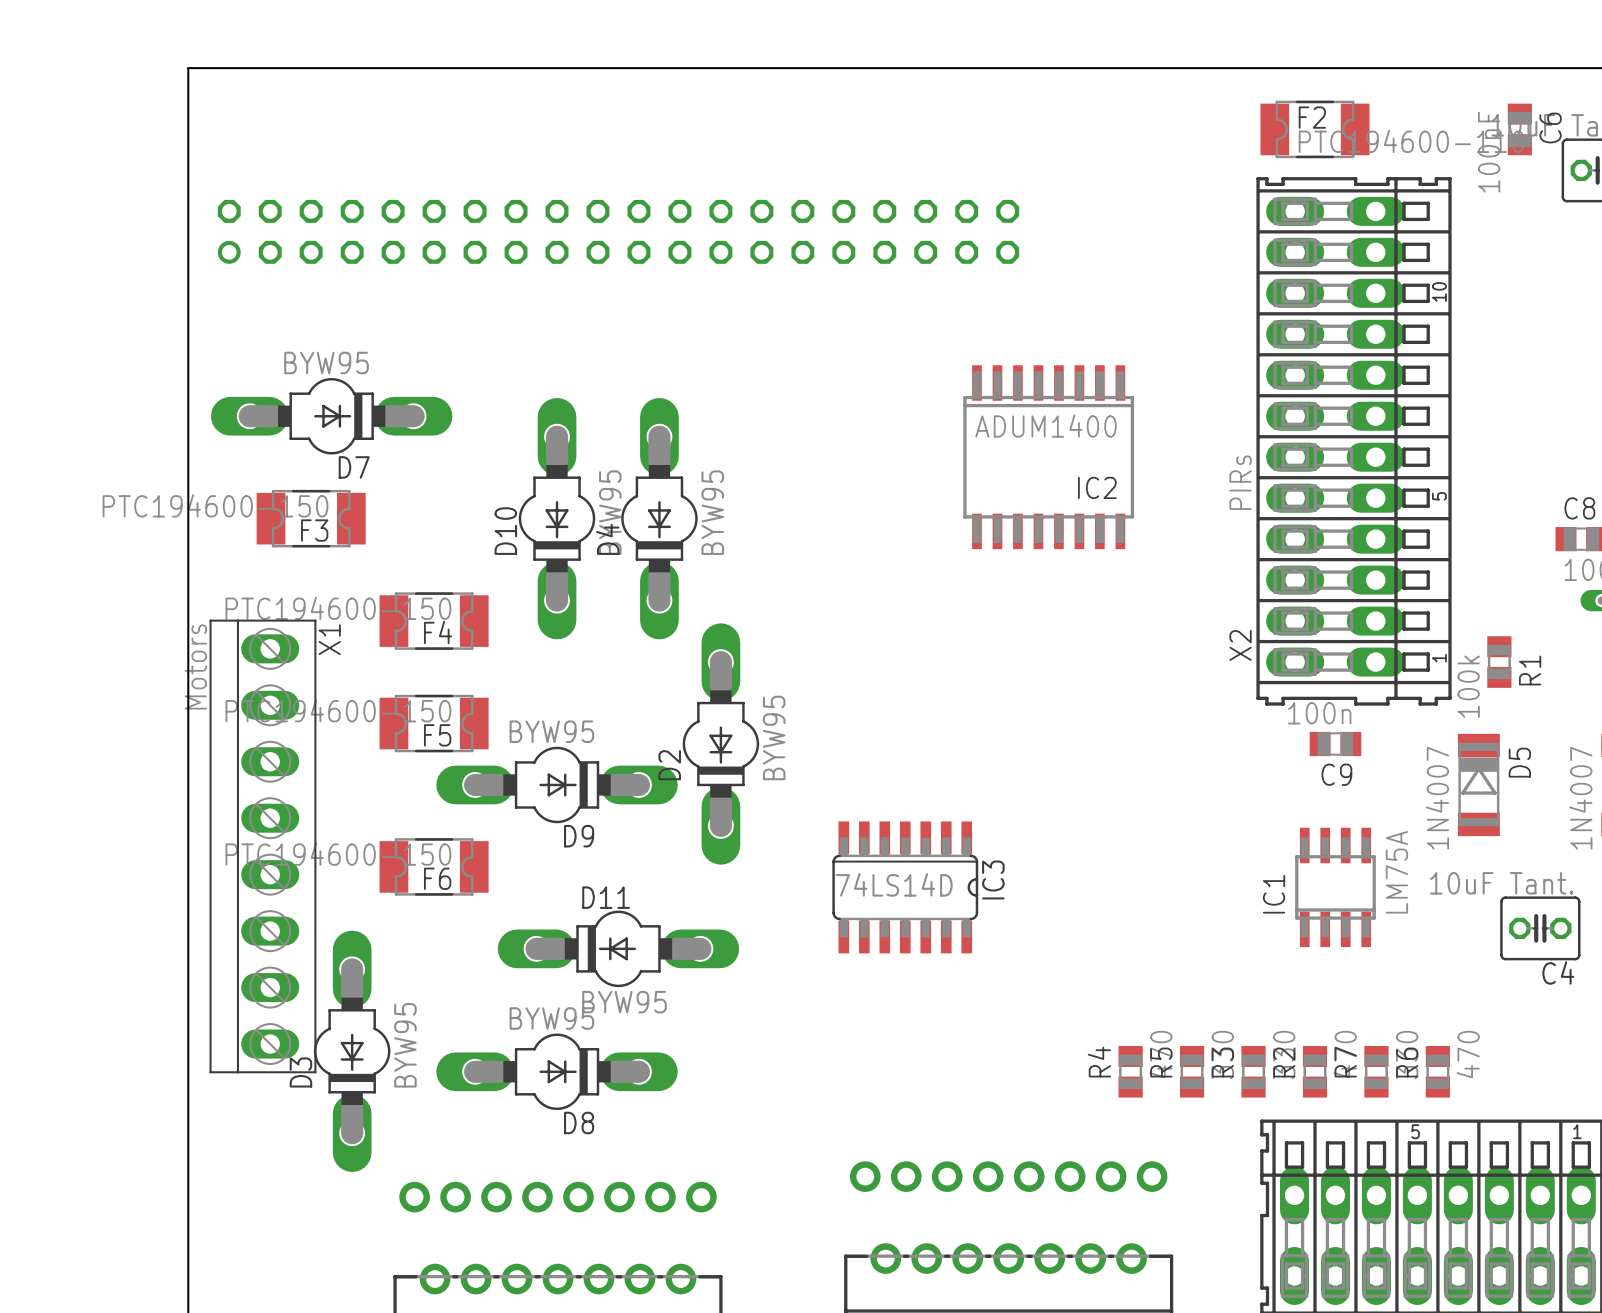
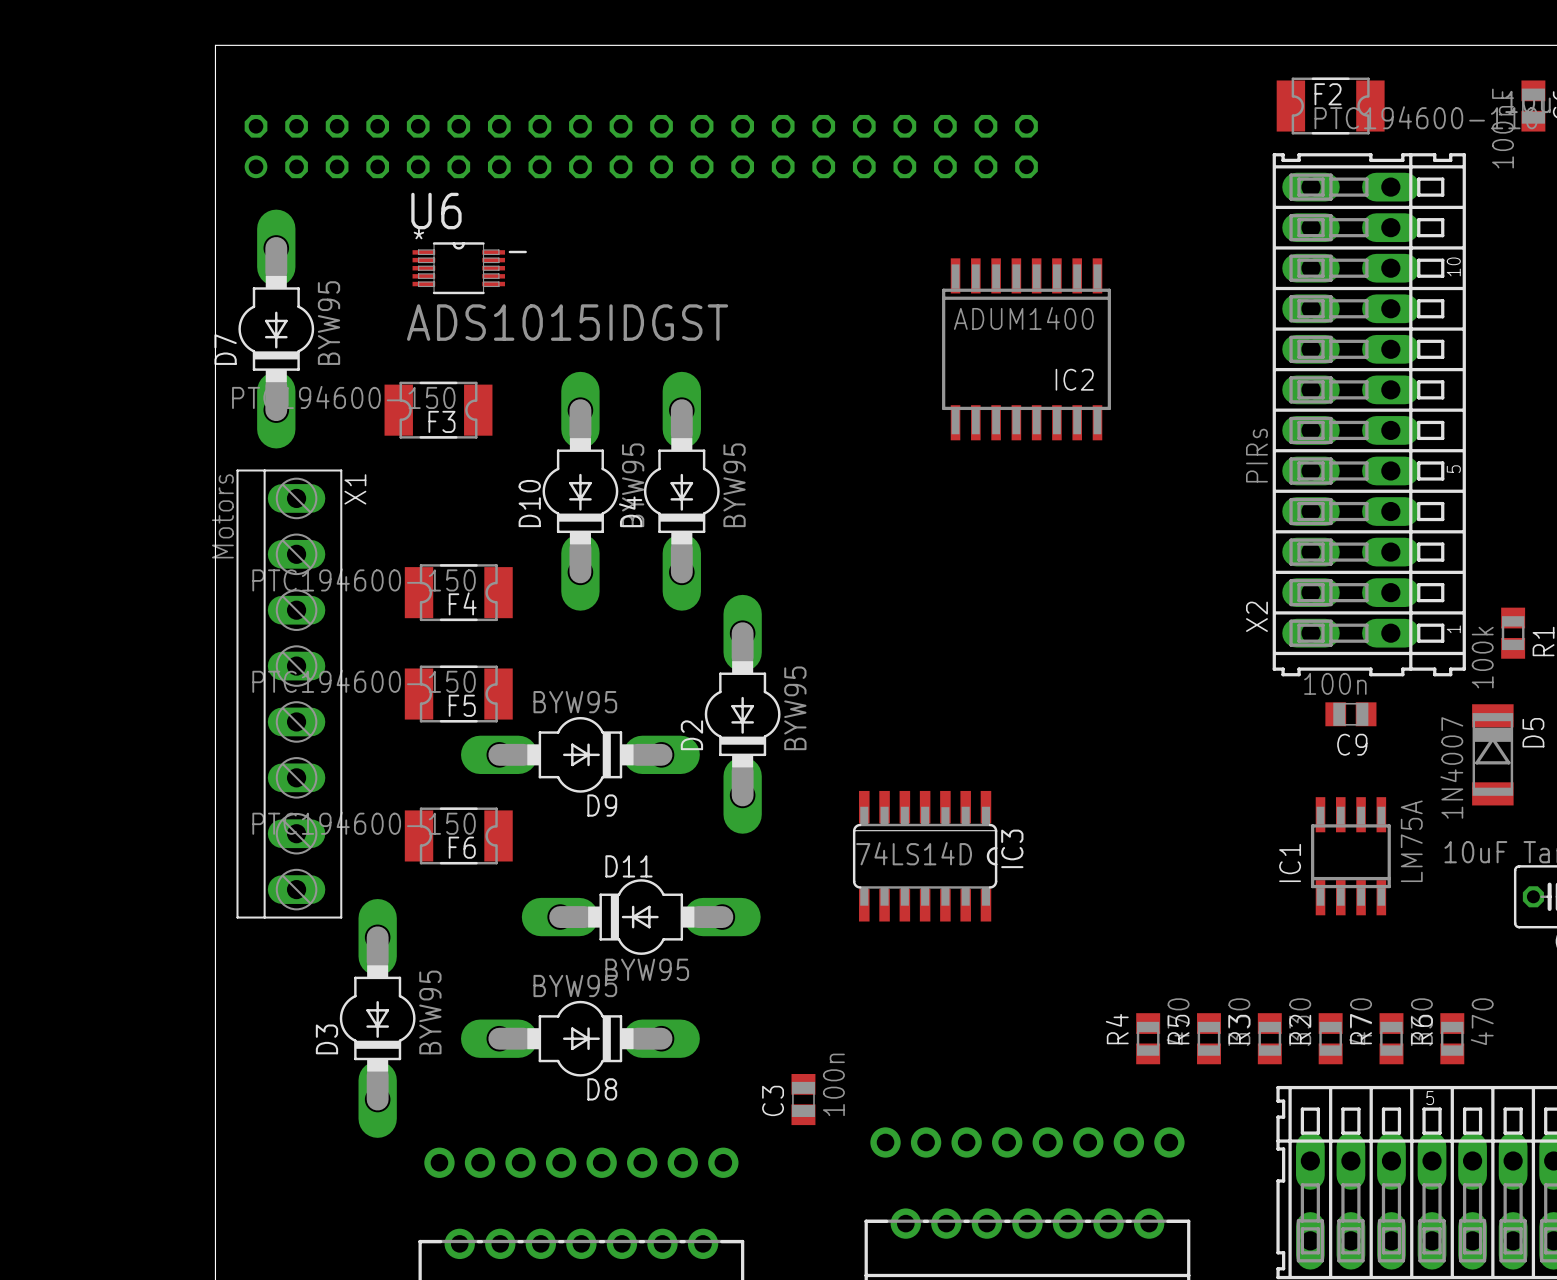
part position: (618, 231) -> (641, 146)
U6: none -> ADS1015IDGST (469, 268)
D7 rotation: 0° (331, 416) -> 90° clockwise (276, 329)
IC2 position: (1048, 457) -> (1026, 349)
F3 position: (311, 518) -> (438, 410)
X1 position: (262, 846) -> (289, 694)
C3: none -> 100n (803, 1099)

